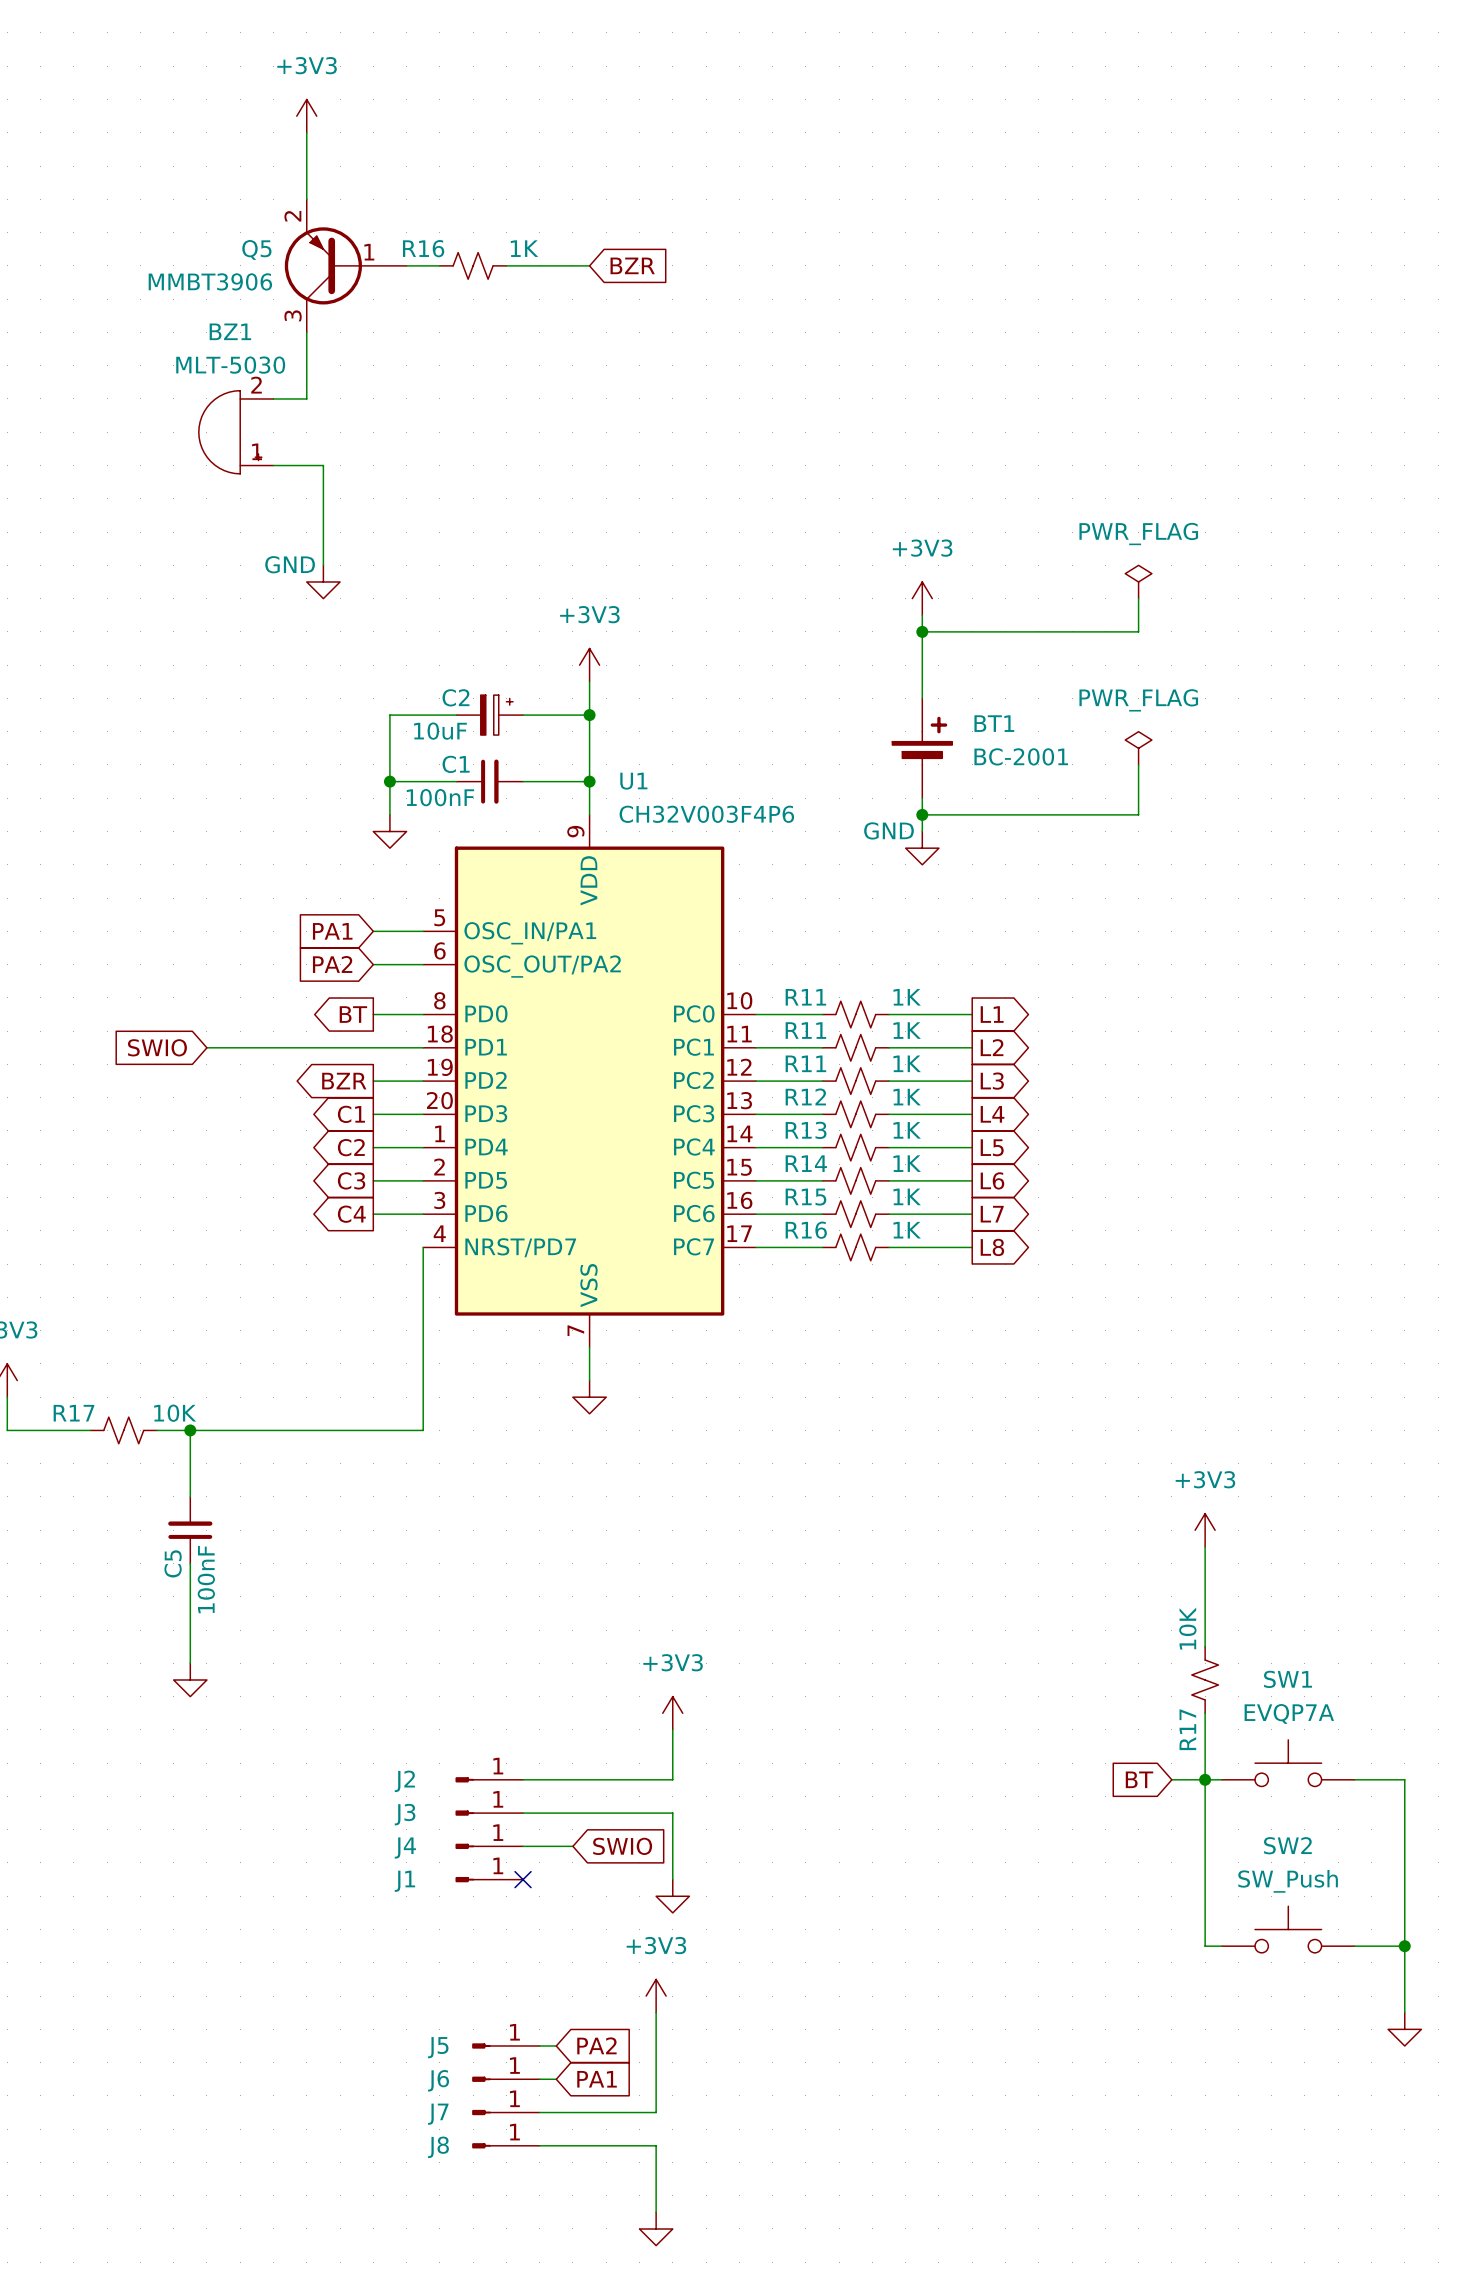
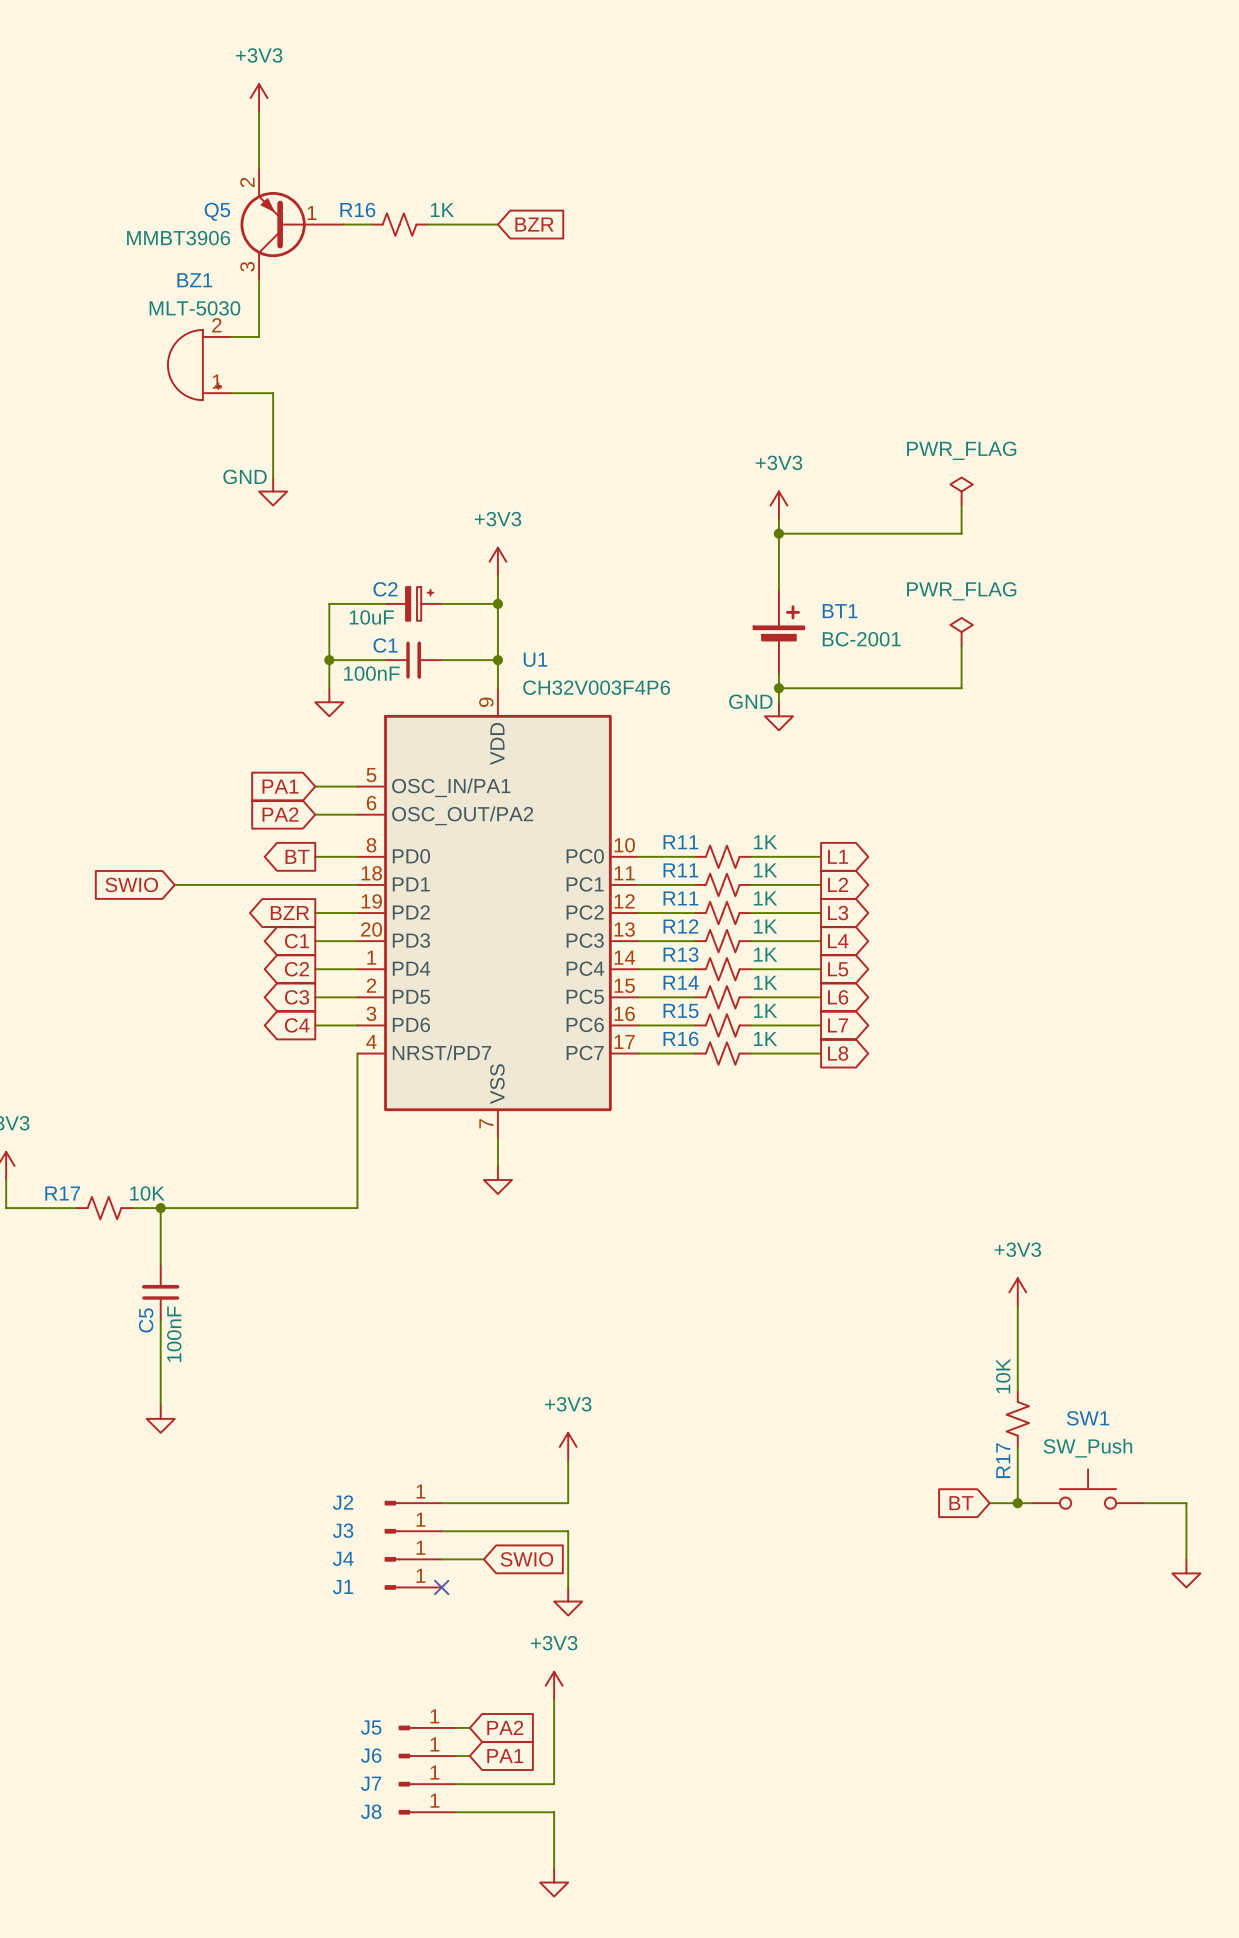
SW1 value: EVQP7A (1289, 1713) -> SW_Push (1087, 1448)
wire: (1205, 1779) (1205, 1946) (1221, 1946) -> none
wire: (1404, 1846) (1404, 2012) -> none
SW2: SW_Push (1288, 1929) -> none
wire: (1354, 1946) (1404, 1946) -> none
junction: (1404, 1946) -> none
power symbol position: (1404, 2029) -> (1186, 1573)

